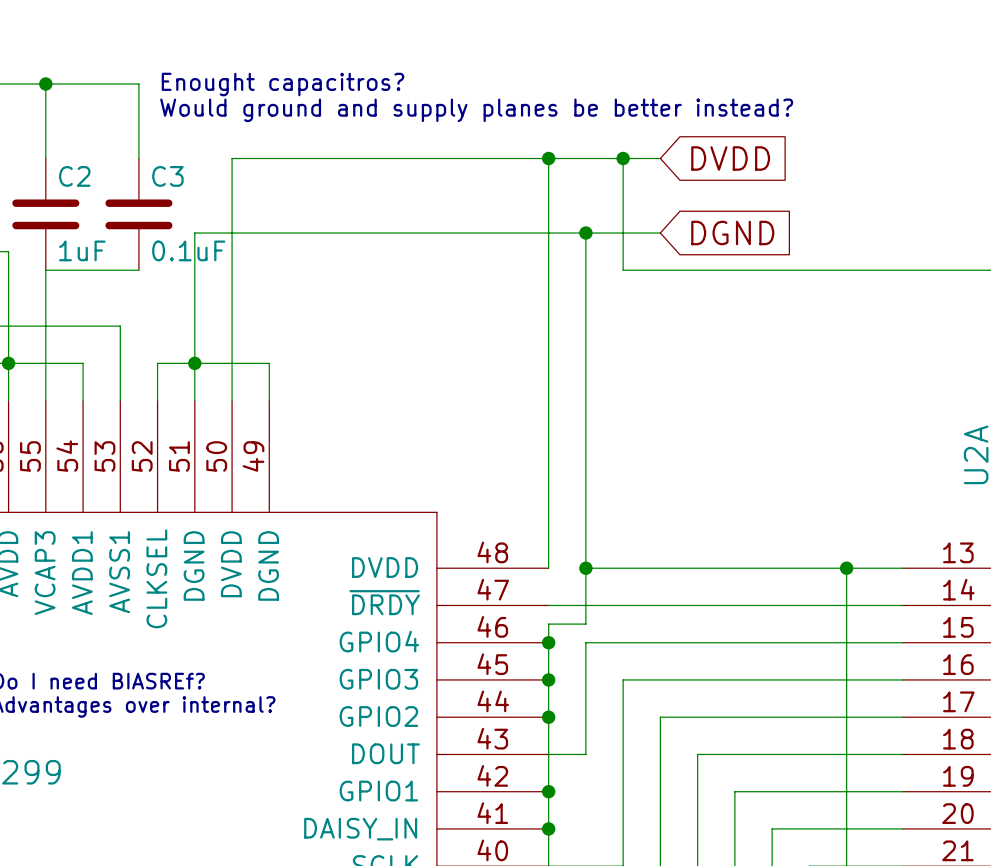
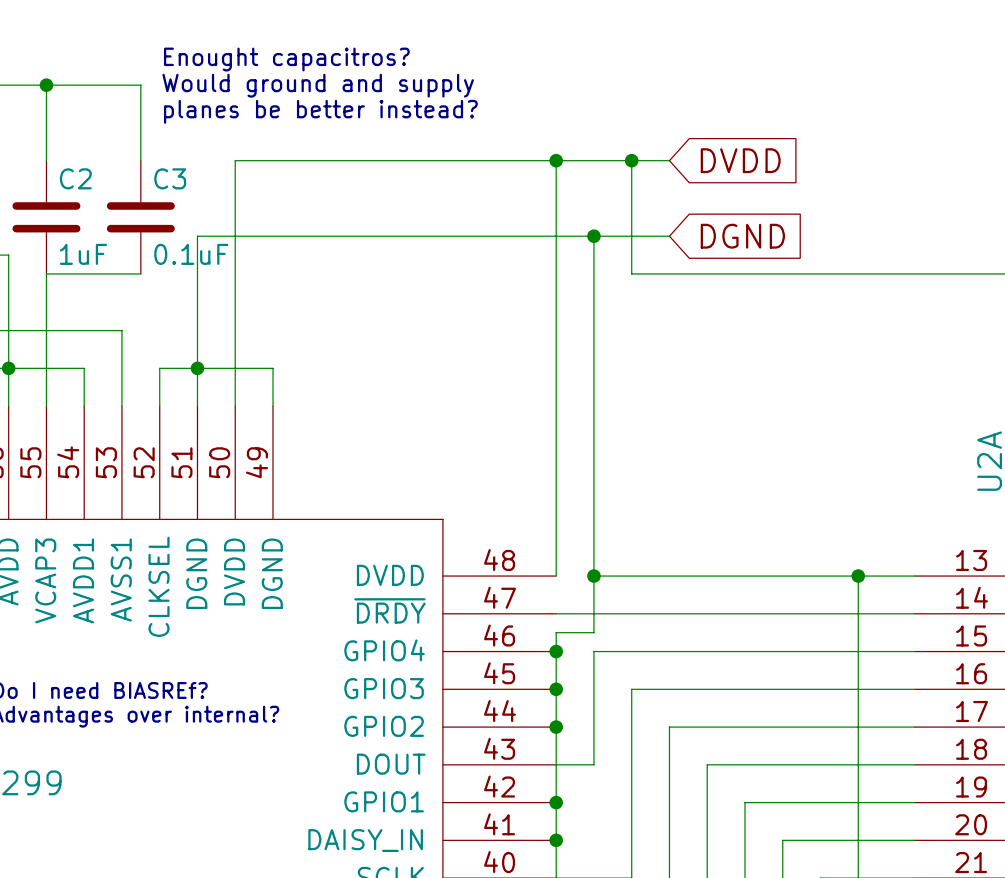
text: none -> Enought capacitros? (286, 59)
text: Enought capacitros? (282, 84) -> Would ground and supply (318, 85)
text: Would ground and supply planes be better instead? (476, 110) -> planes be better instead? (320, 111)

